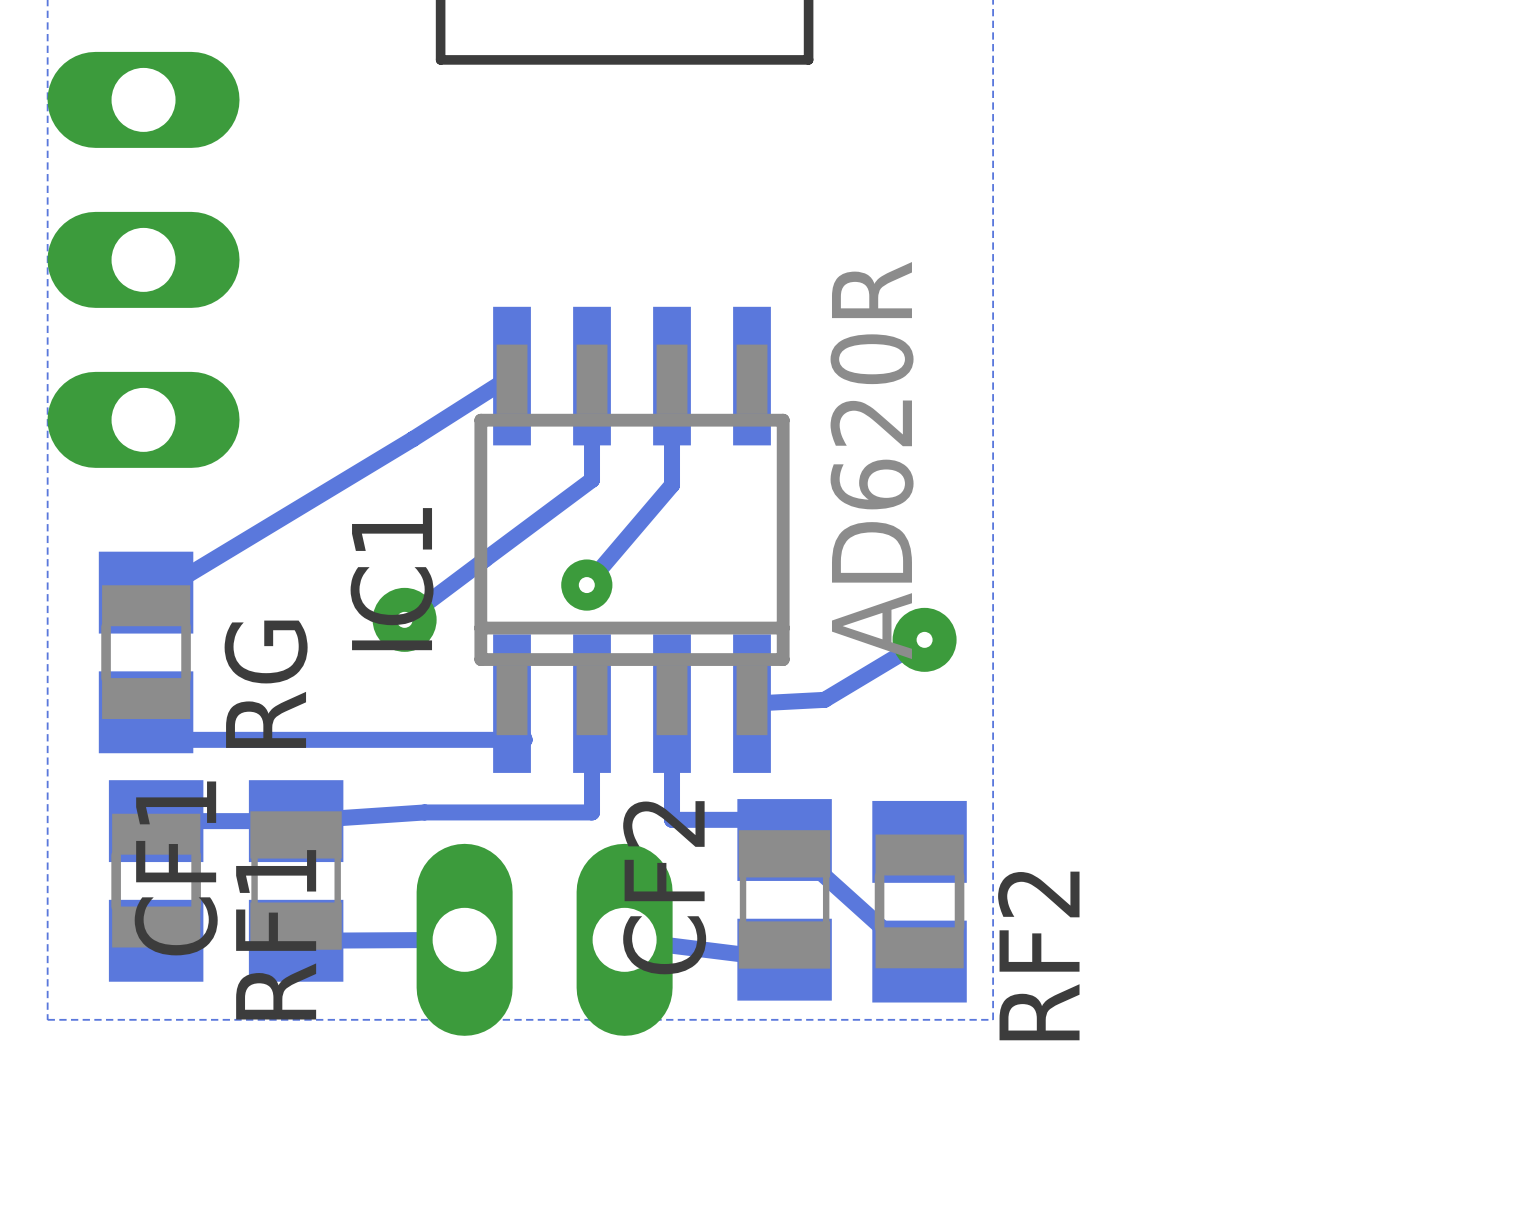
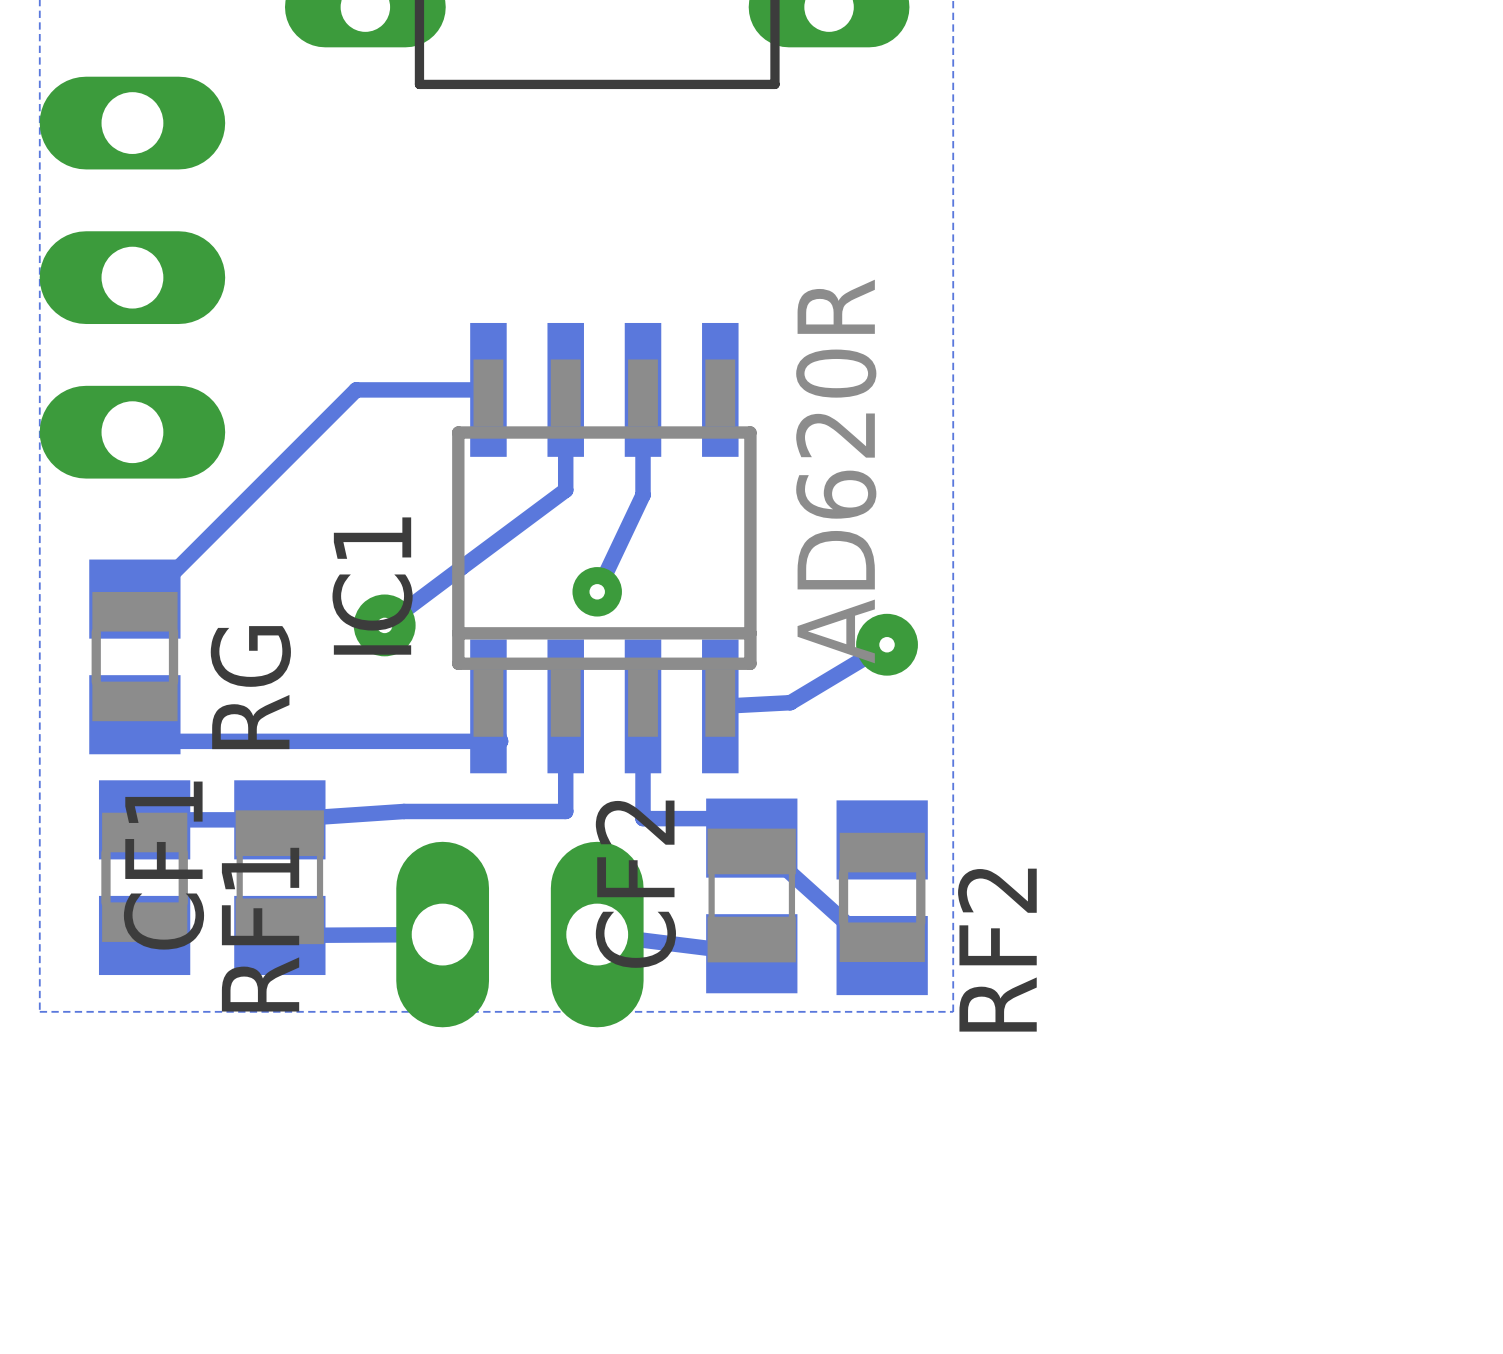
track: (512, 376) (412, 439) (158, 592) -> (488, 389) (356, 389) (147, 599)
track: (672, 485) (586, 585) -> (643, 495) (597, 591)
via position: (586, 585) -> (597, 591)

